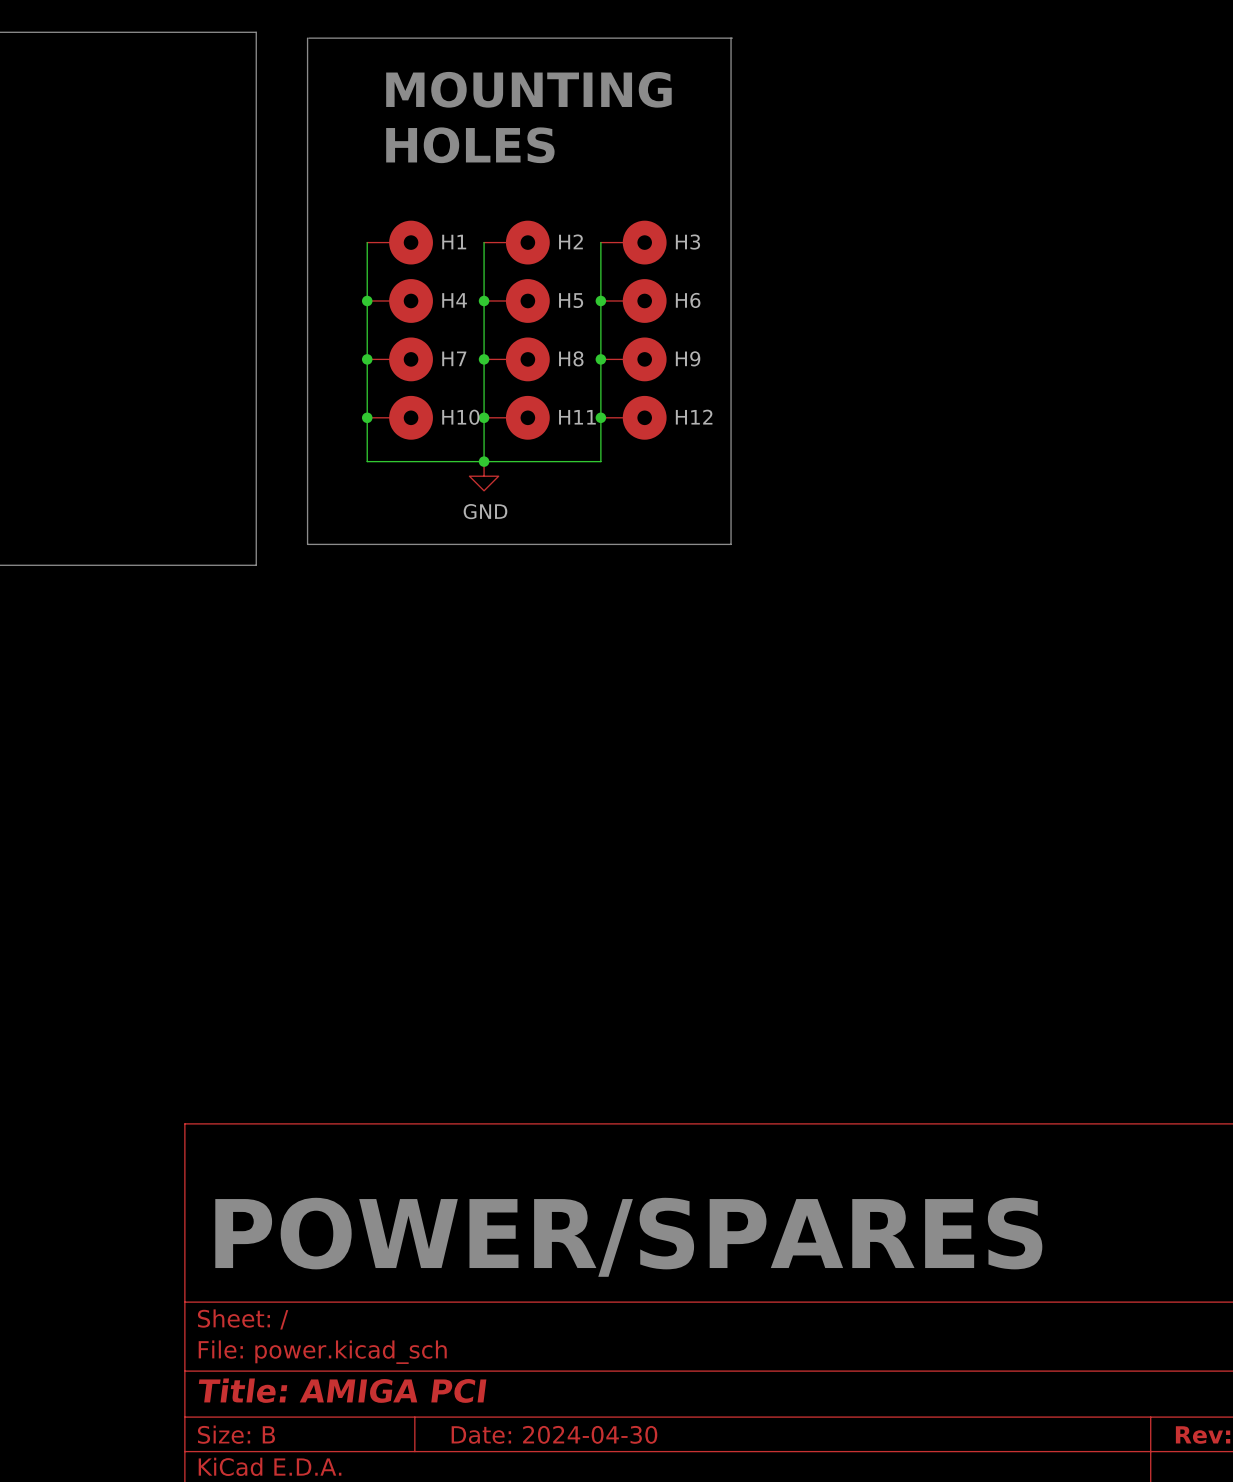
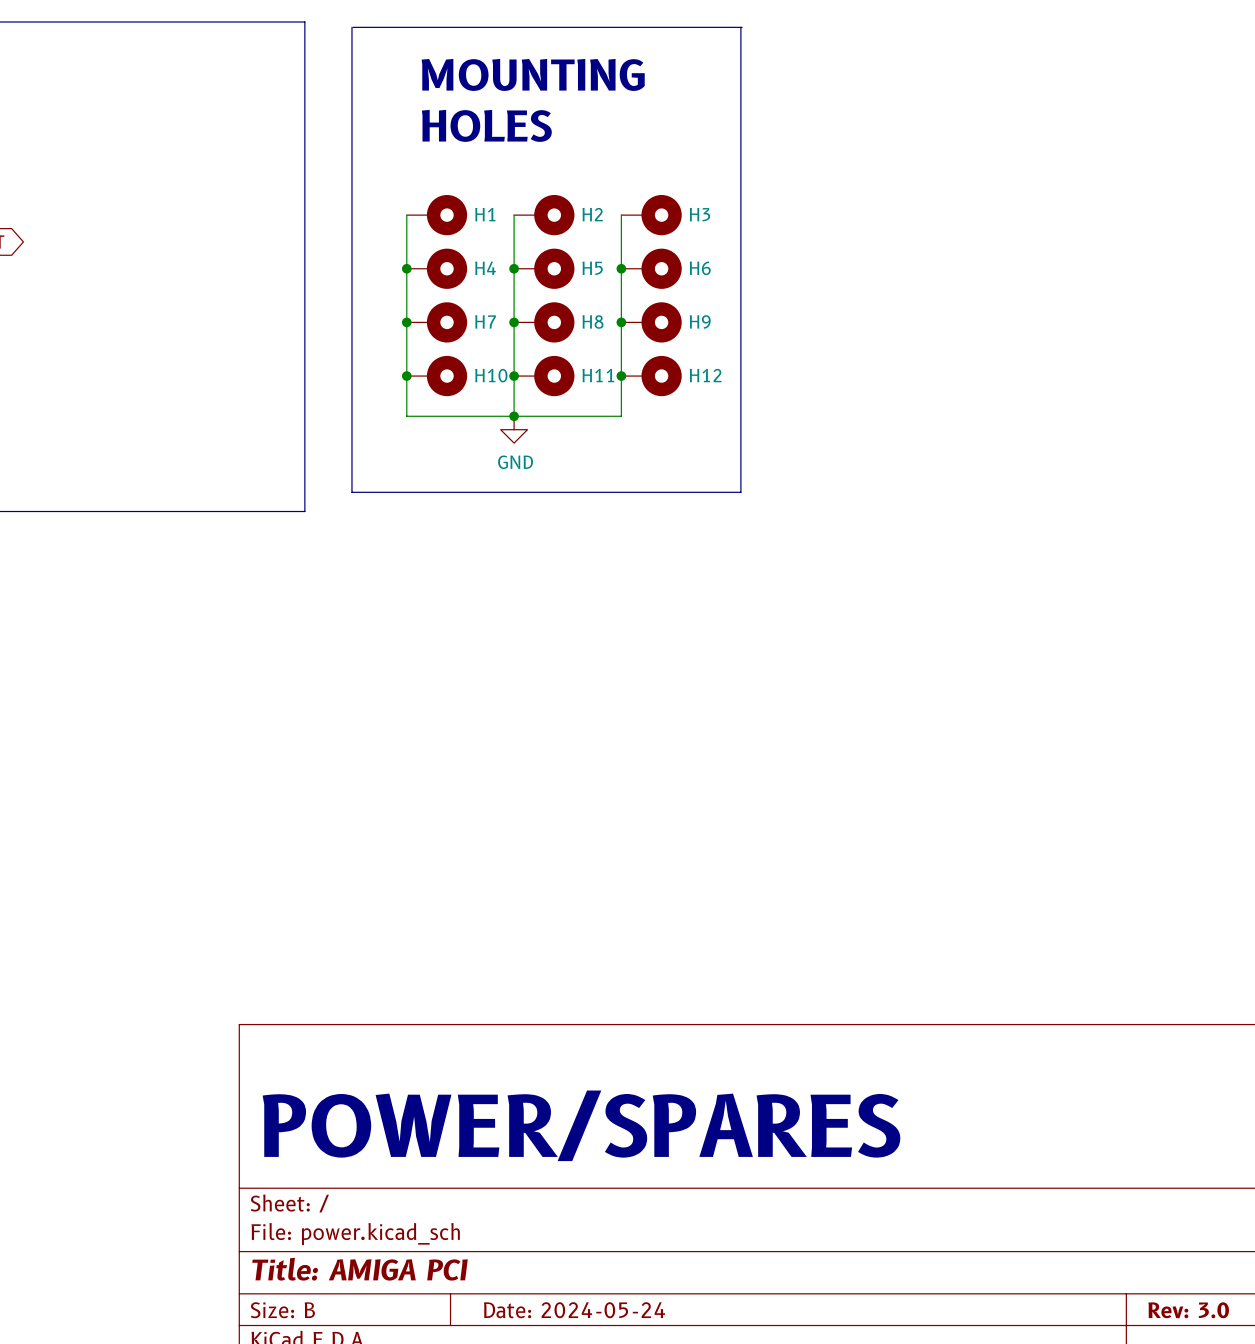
title block: Date: 2024-04-30 (554, 1434) -> Date: 2024-05-24 (574, 1310)

